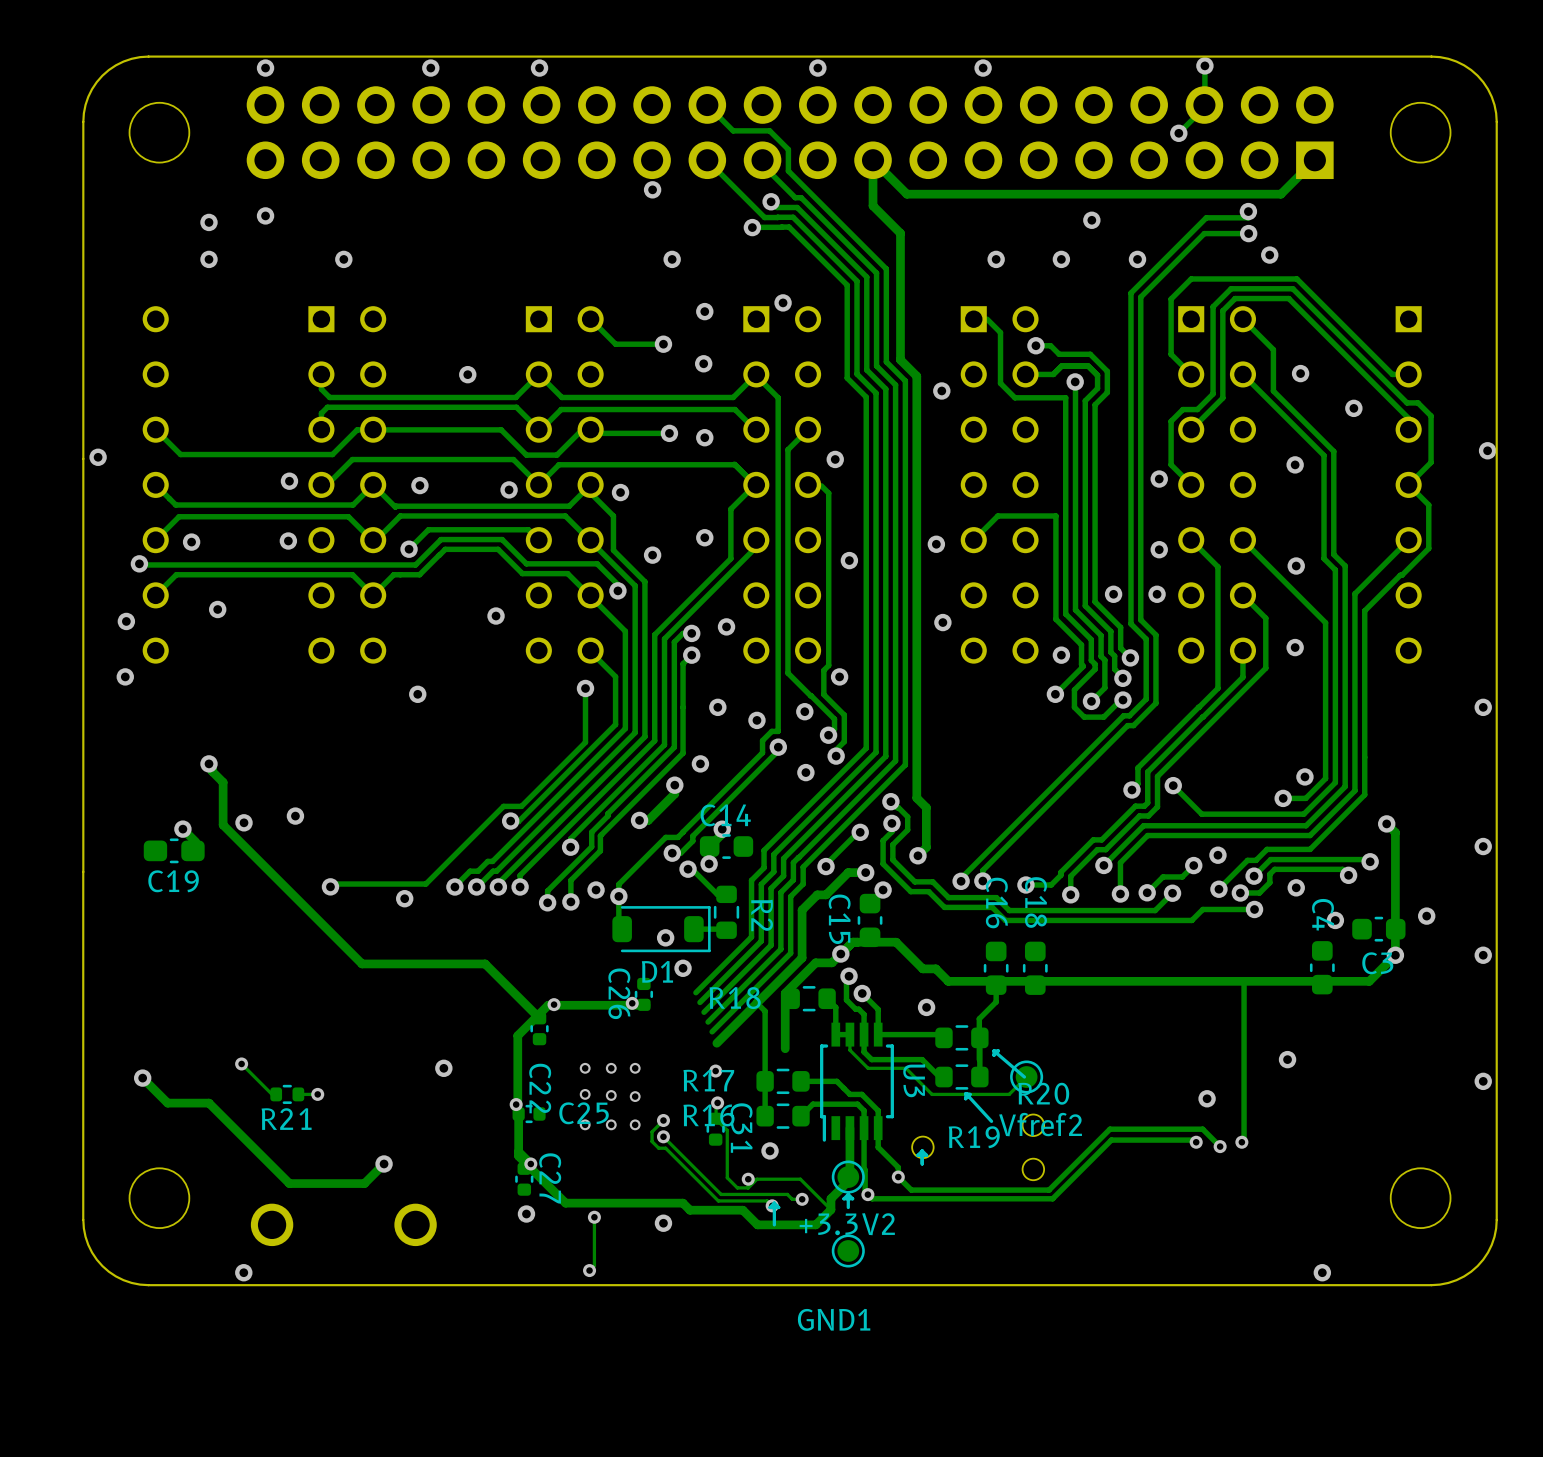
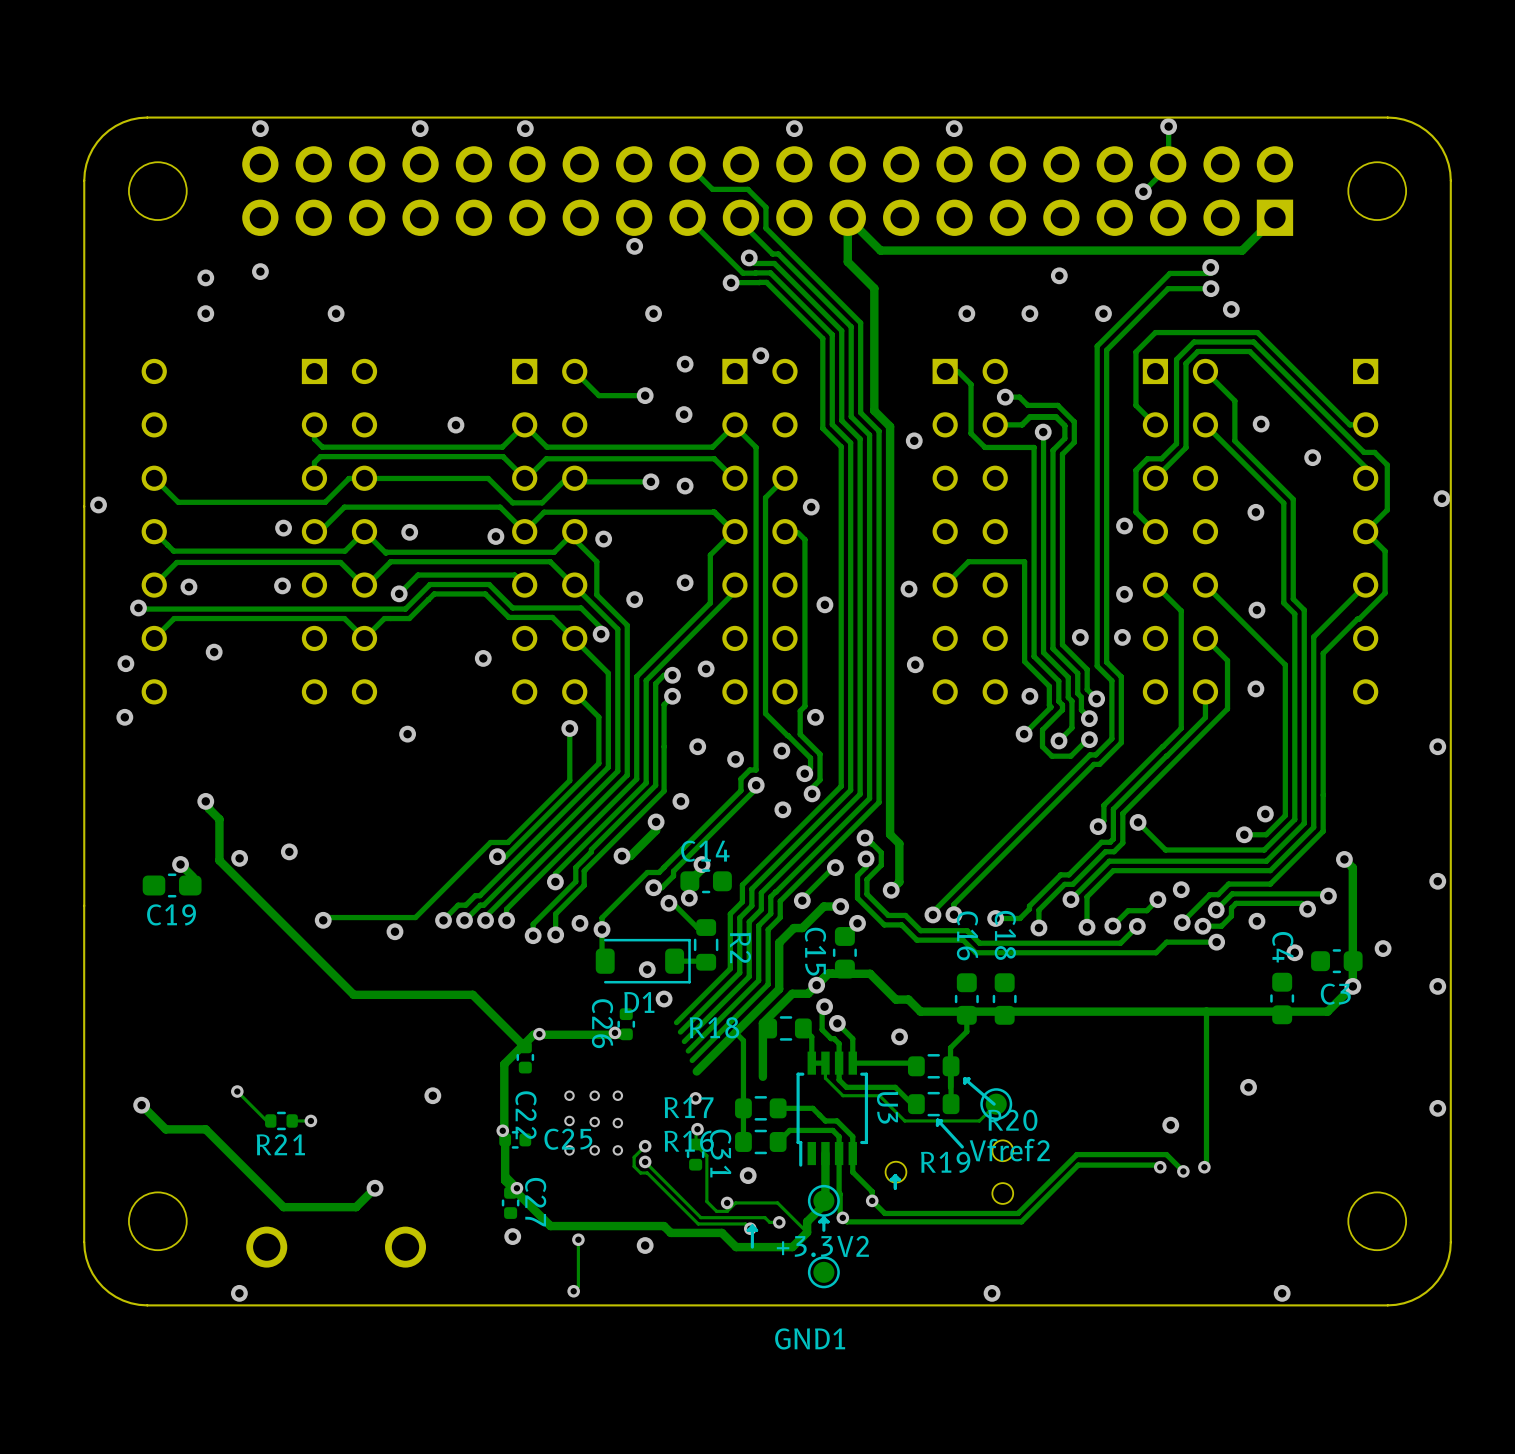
via: none -> (992, 1293)

